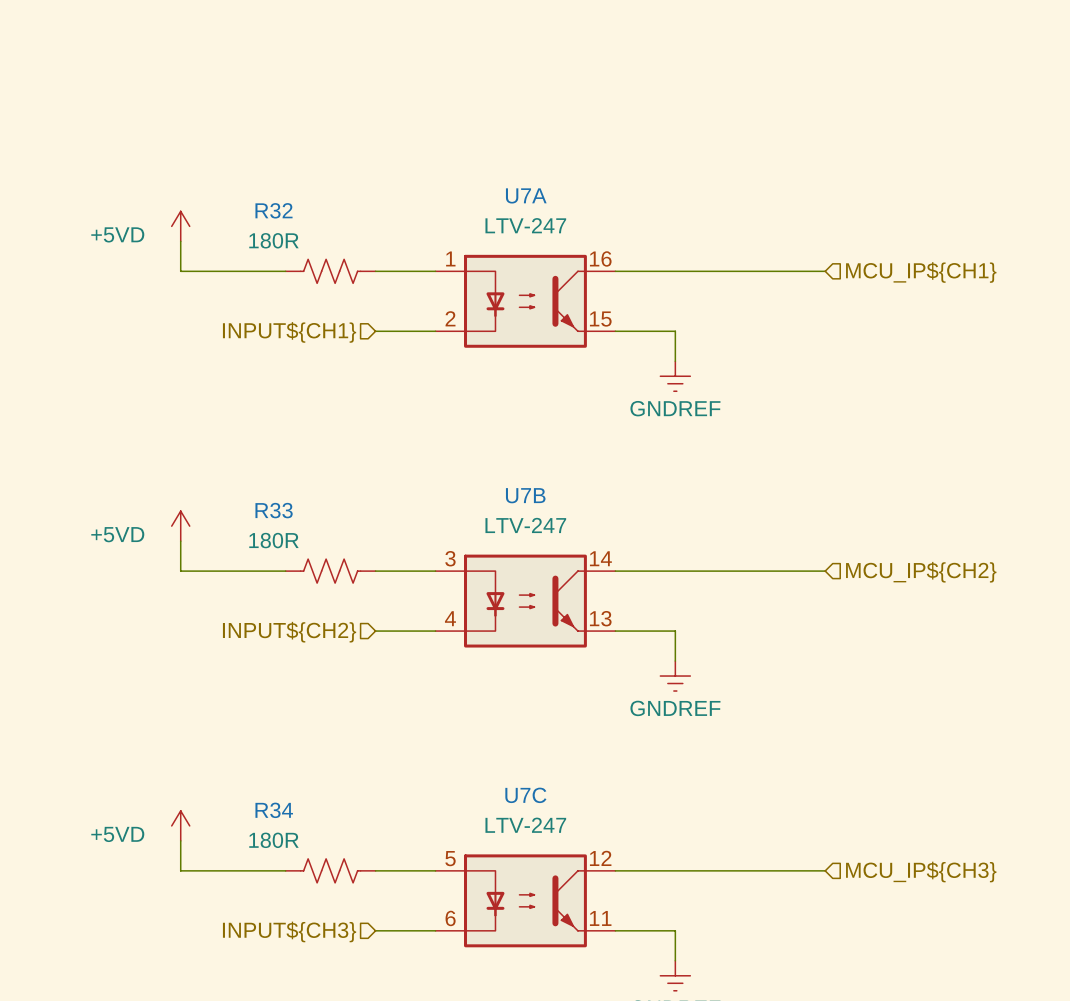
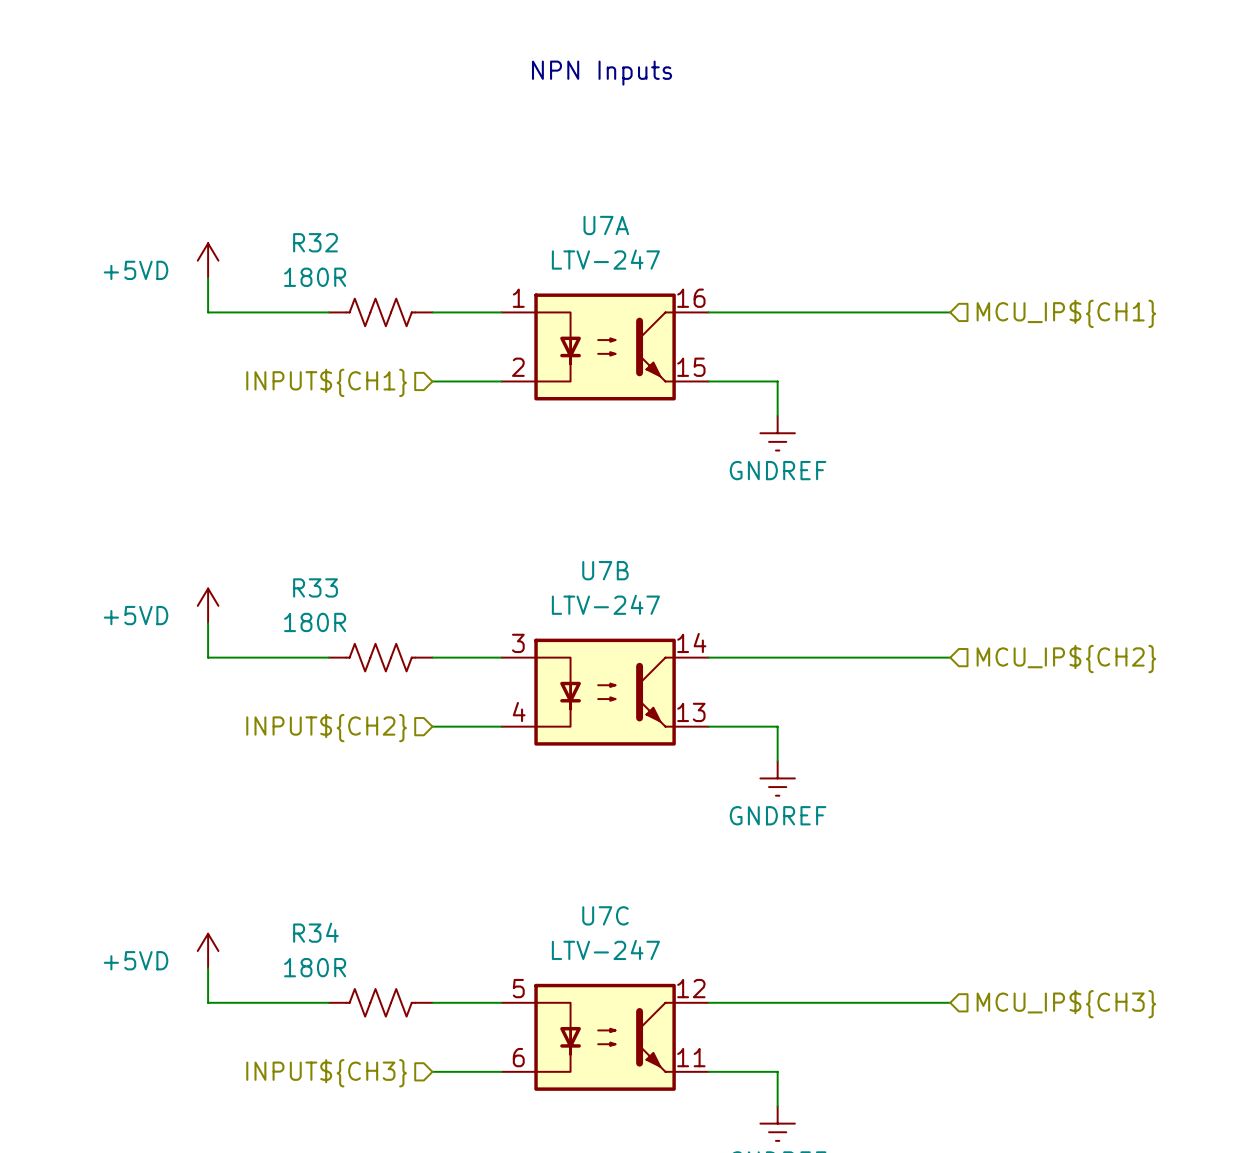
text: none -> NPN Inputs (602, 73)

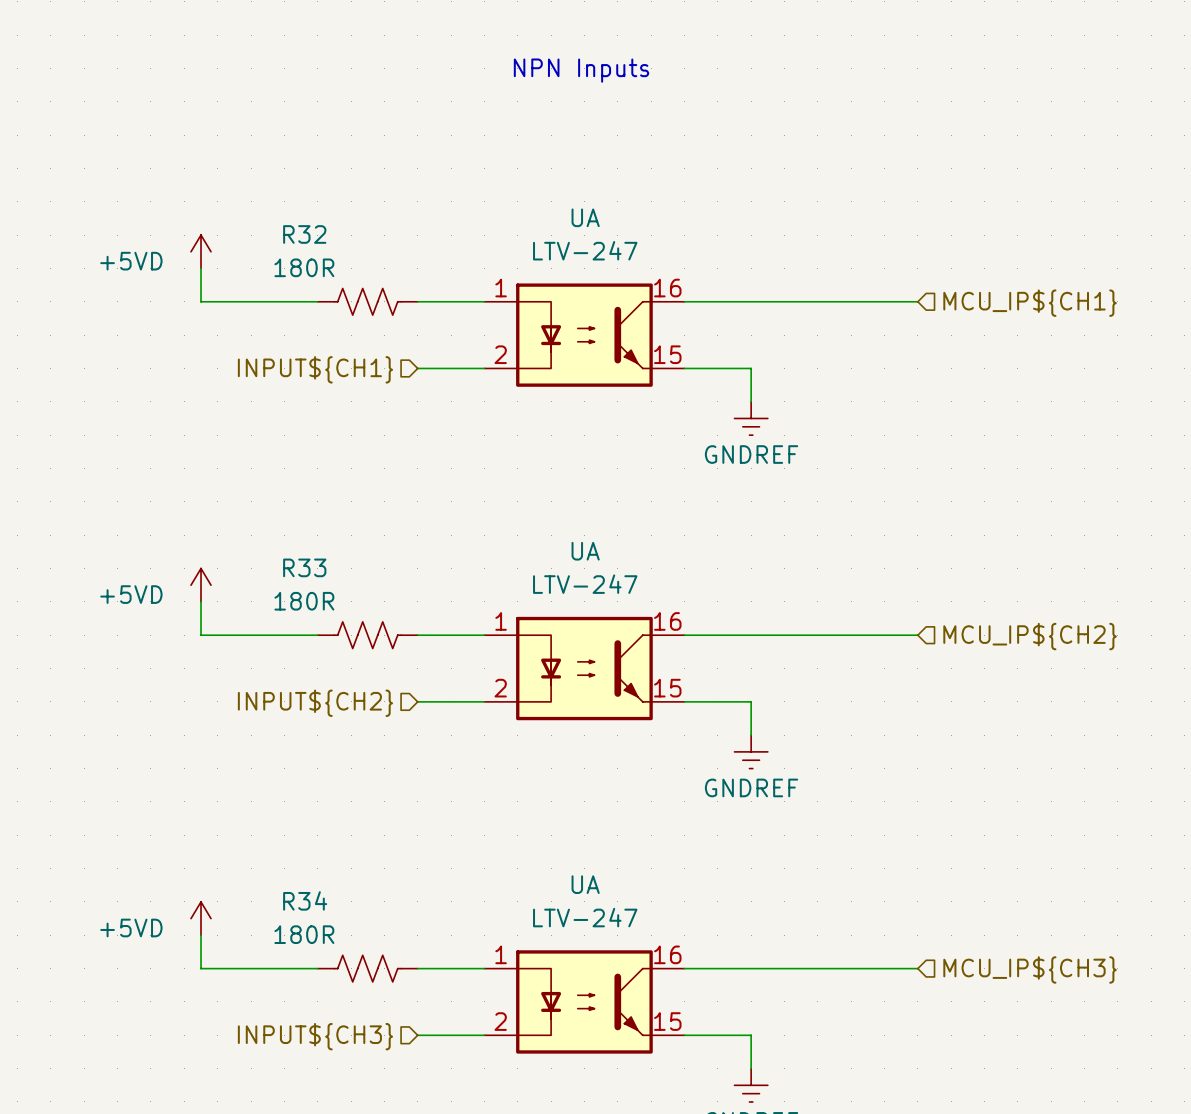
U7A name: U7A (606, 225) -> UA (585, 217)
U7B name: U7B (605, 570) -> UA (585, 551)
U7B pin number: 14 (691, 642) -> 16 (667, 621)
U7B pin number: 3 (518, 643) -> 1 (501, 621)
U7B pin number: 4 (519, 712) -> 2 (500, 688)
U7B pin number: 13 (691, 712) -> 15 (667, 688)
U7C name: U7C (605, 915) -> UA (585, 884)
U7C pin number: 5 (518, 988) -> 1 (501, 954)
U7C pin number: 12 (691, 988) -> 16 (667, 954)
U7C pin number: 6 (518, 1057) -> 2 (500, 1021)
U7C pin number: 11 (691, 1057) -> 15 (667, 1021)

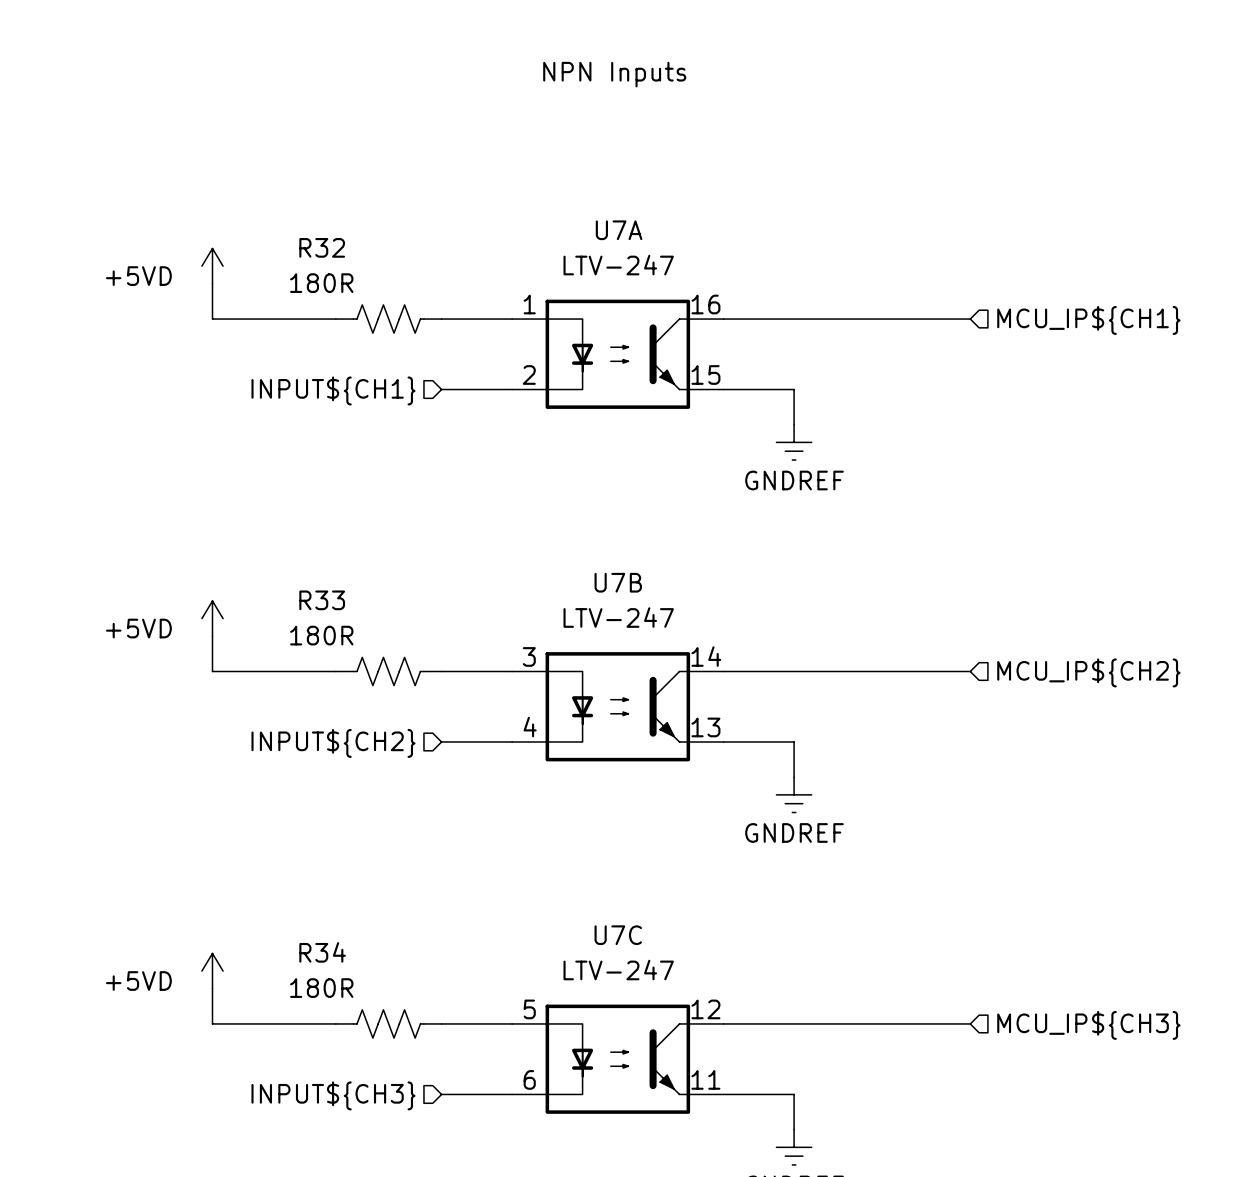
UA name: UA (585, 217) -> U7A (619, 230)
UA name: UA (585, 551) -> U7B (618, 582)
UA pin number: 1 (501, 621) -> 3 (529, 656)
UA pin number: 16 (667, 621) -> 14 (706, 656)
UA pin number: 2 (500, 688) -> 4 (530, 727)
UA pin number: 15 (667, 688) -> 13 (705, 727)
UA name: UA (585, 884) -> U7C (618, 935)
UA pin number: 1 (501, 954) -> 5 (529, 1009)
UA pin number: 16 (667, 954) -> 12 (705, 1009)
UA pin number: 2 (500, 1021) -> 6 (529, 1079)
UA pin number: 15 (667, 1021) -> 11 (705, 1079)

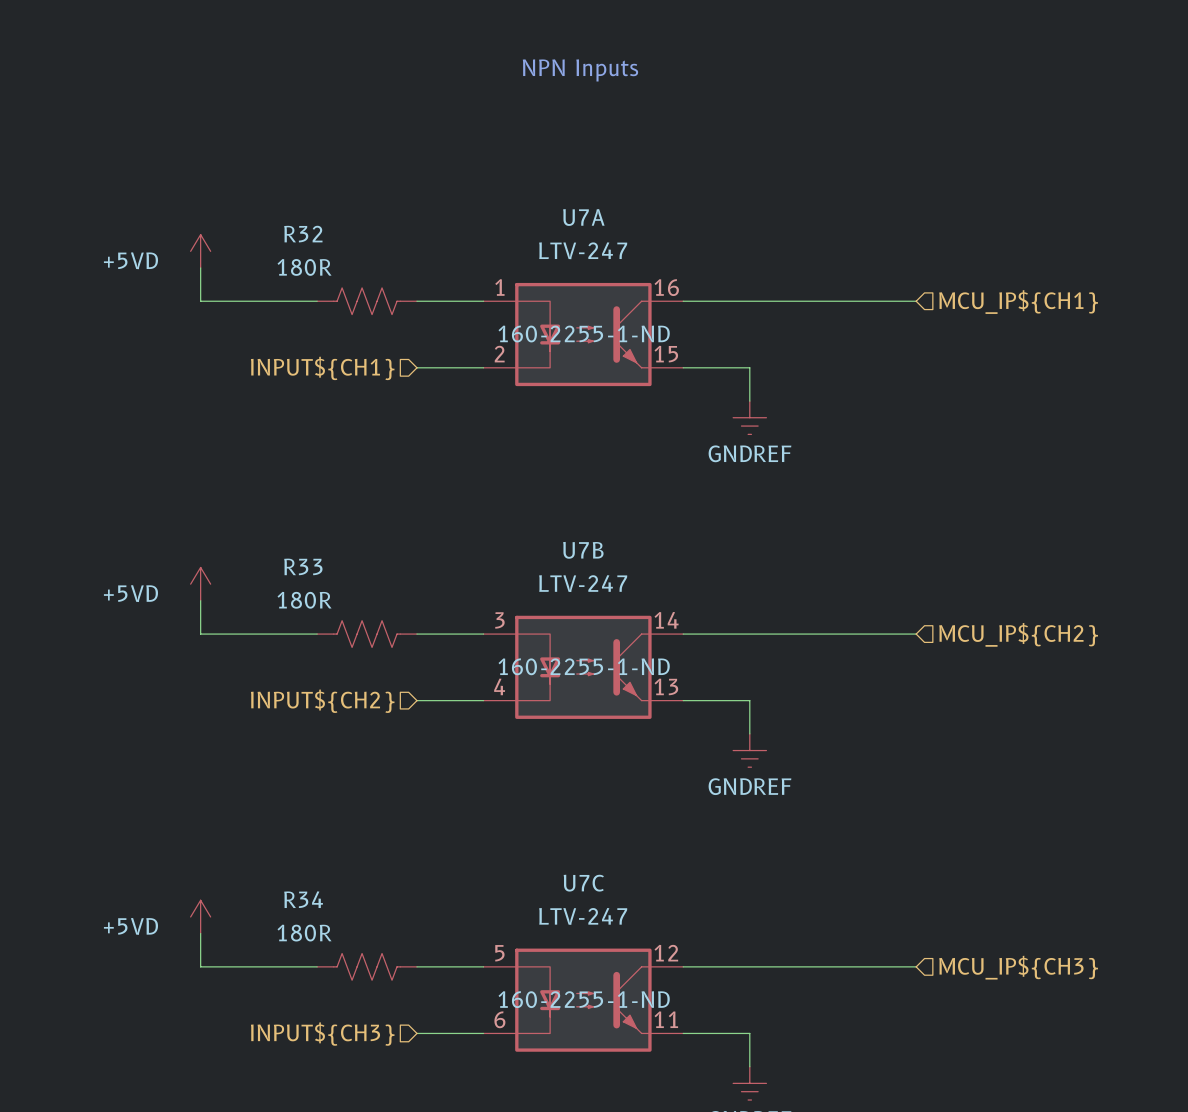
U7A text: none -> 160-2255-1-ND (584, 334)
U7B text: none -> 160-2255-1-ND (584, 666)
U7C text: none -> 160-2255-1-ND (584, 999)

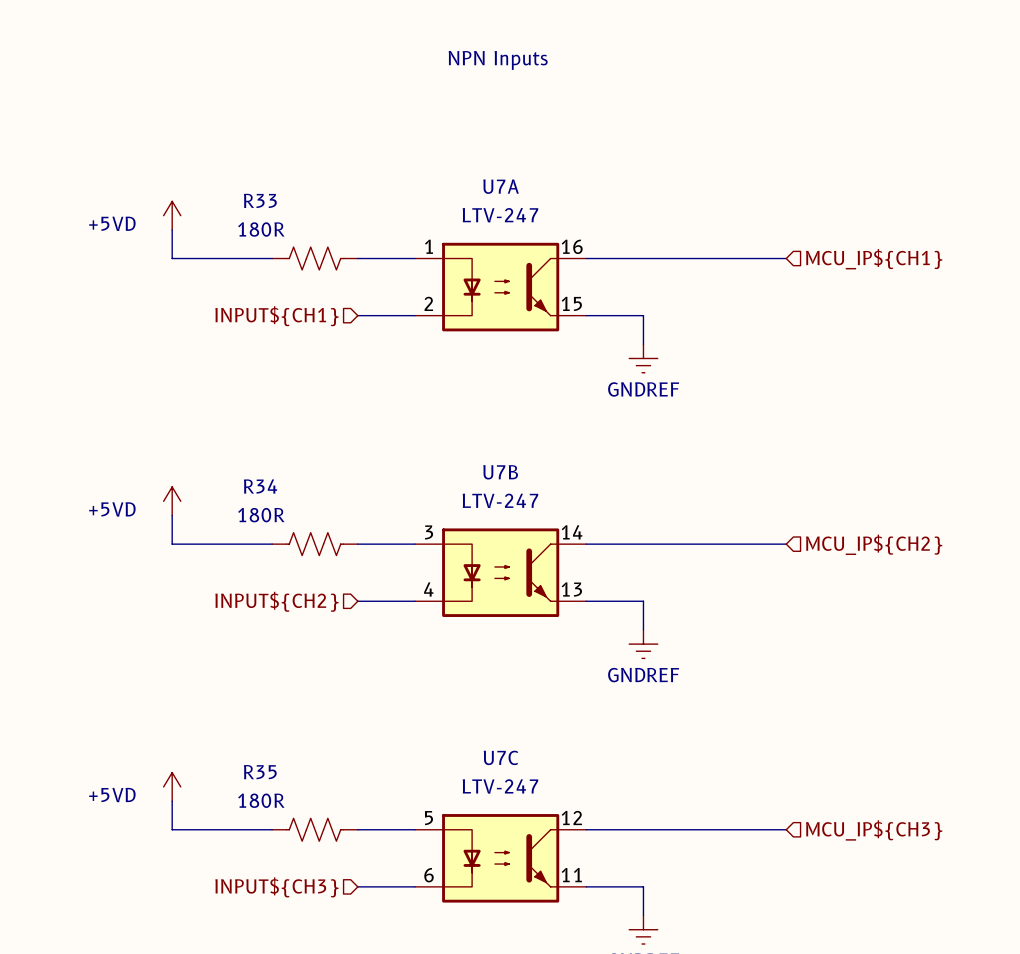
R32 name: R32 (303, 234) -> R33 (260, 200)
U7A text: 160-2255-1-ND (584, 334) -> none
R33 name: R33 (303, 566) -> R34 (260, 486)
U7B text: 160-2255-1-ND (584, 666) -> none
R34 name: R34 (303, 899) -> R35 (260, 772)
U7C text: 160-2255-1-ND (584, 999) -> none

